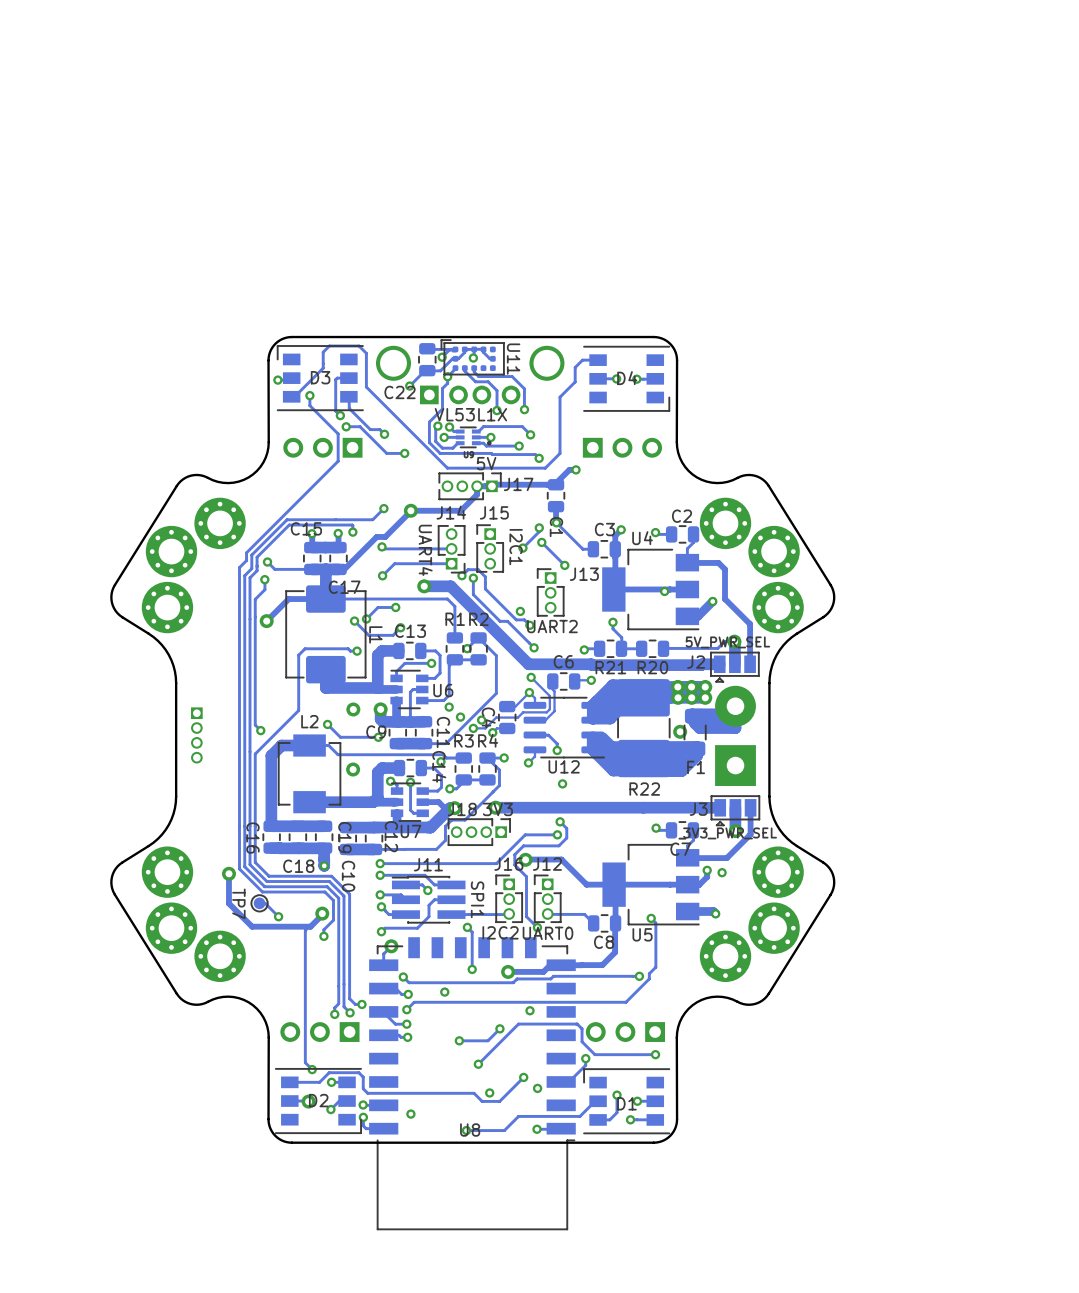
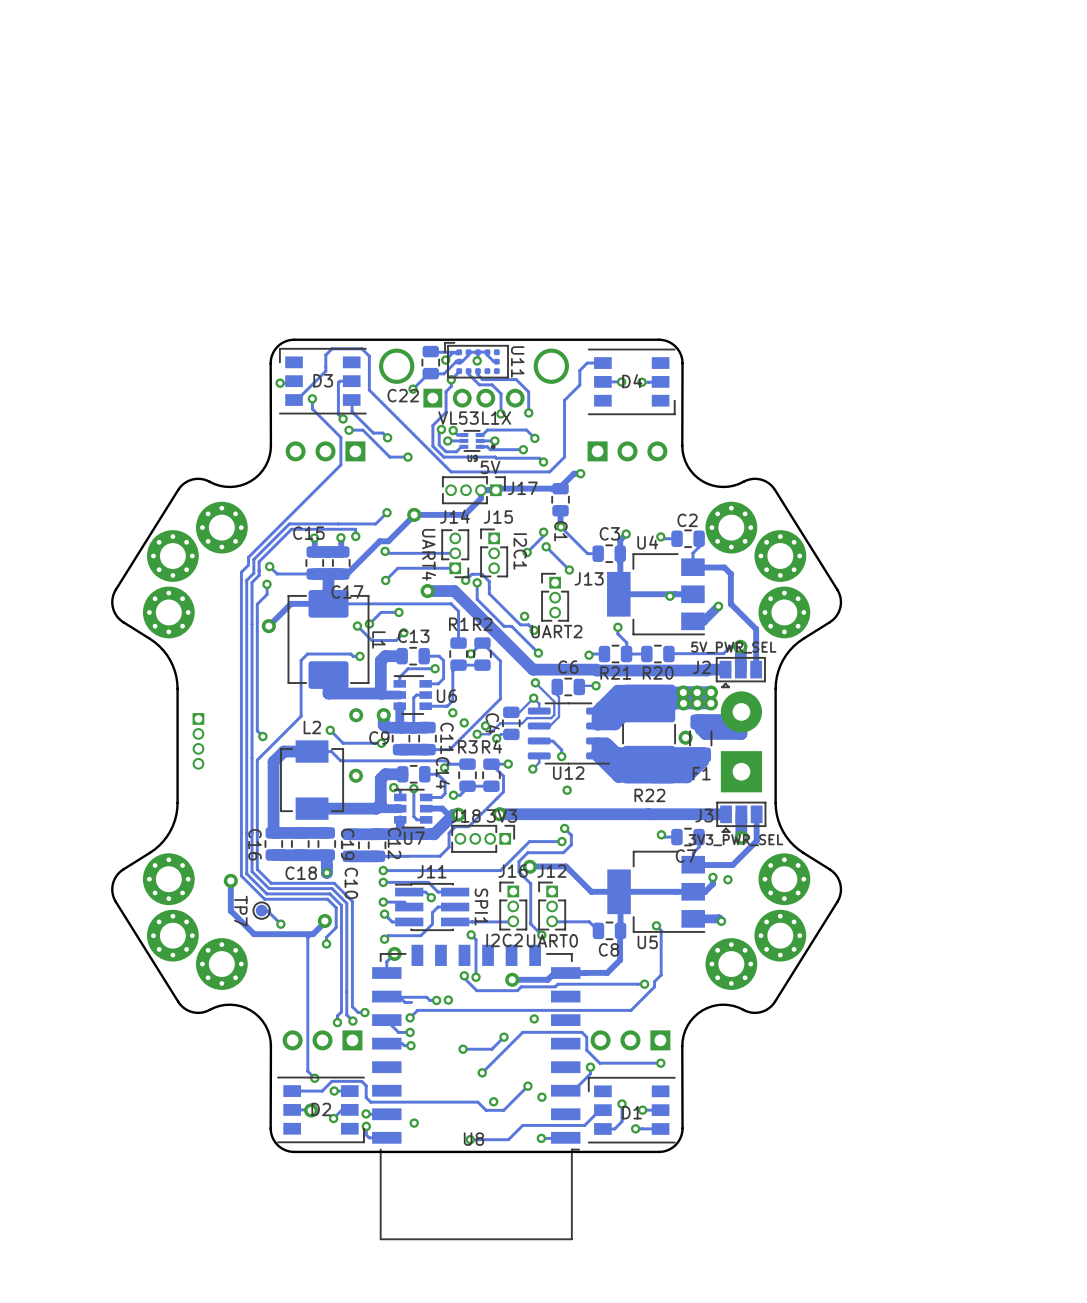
via: none -> (464, 975)
track: (403, 977) (409, 982) (472, 982) -> (464, 975) (464, 978) (476, 990)
via: (403, 977) -> none
track: none -> (386, 997) (426, 997) (429, 1000) (436, 1000)
via: none -> (436, 1000)
via: (408, 994) -> none

